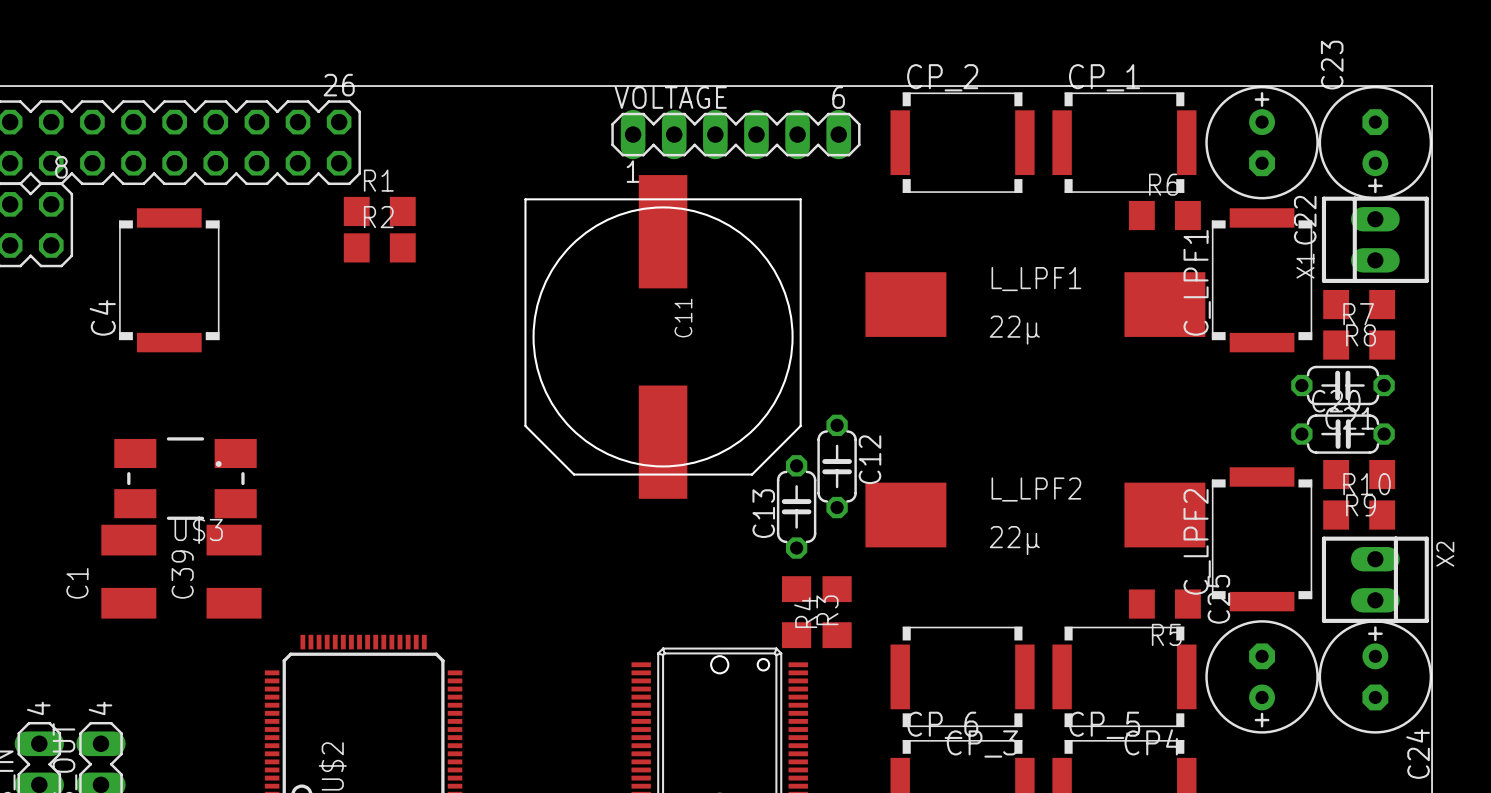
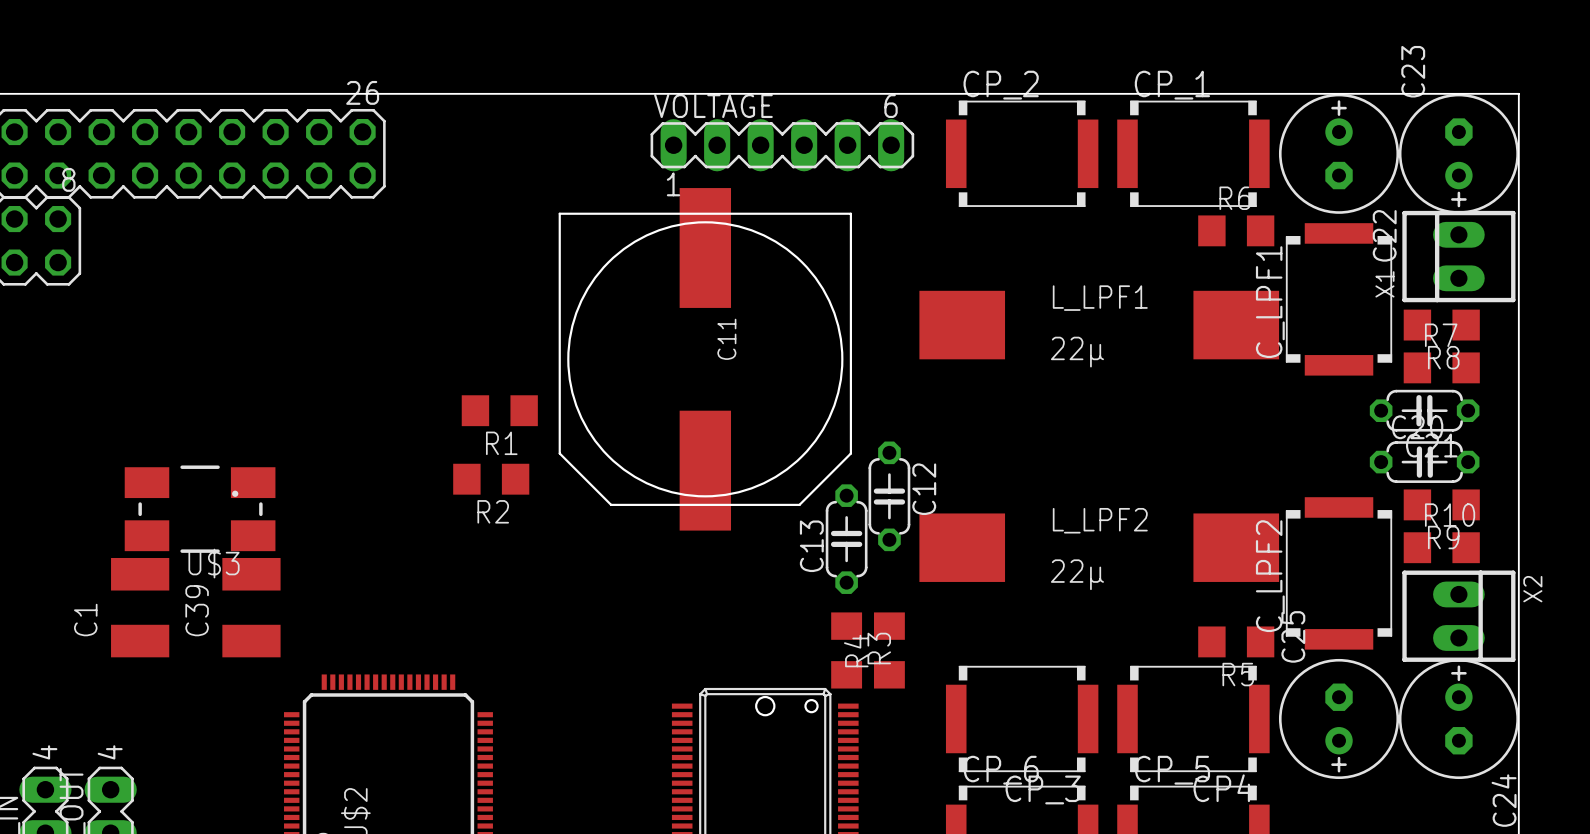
R1 name position: R1 (378, 180) -> R1 (501, 443)
R1 position: (379, 211) -> (499, 410)
R2 name position: R2 (378, 217) -> R2 (493, 511)
R2 position: (379, 247) -> (491, 479)
C4: (169, 280) -> none

